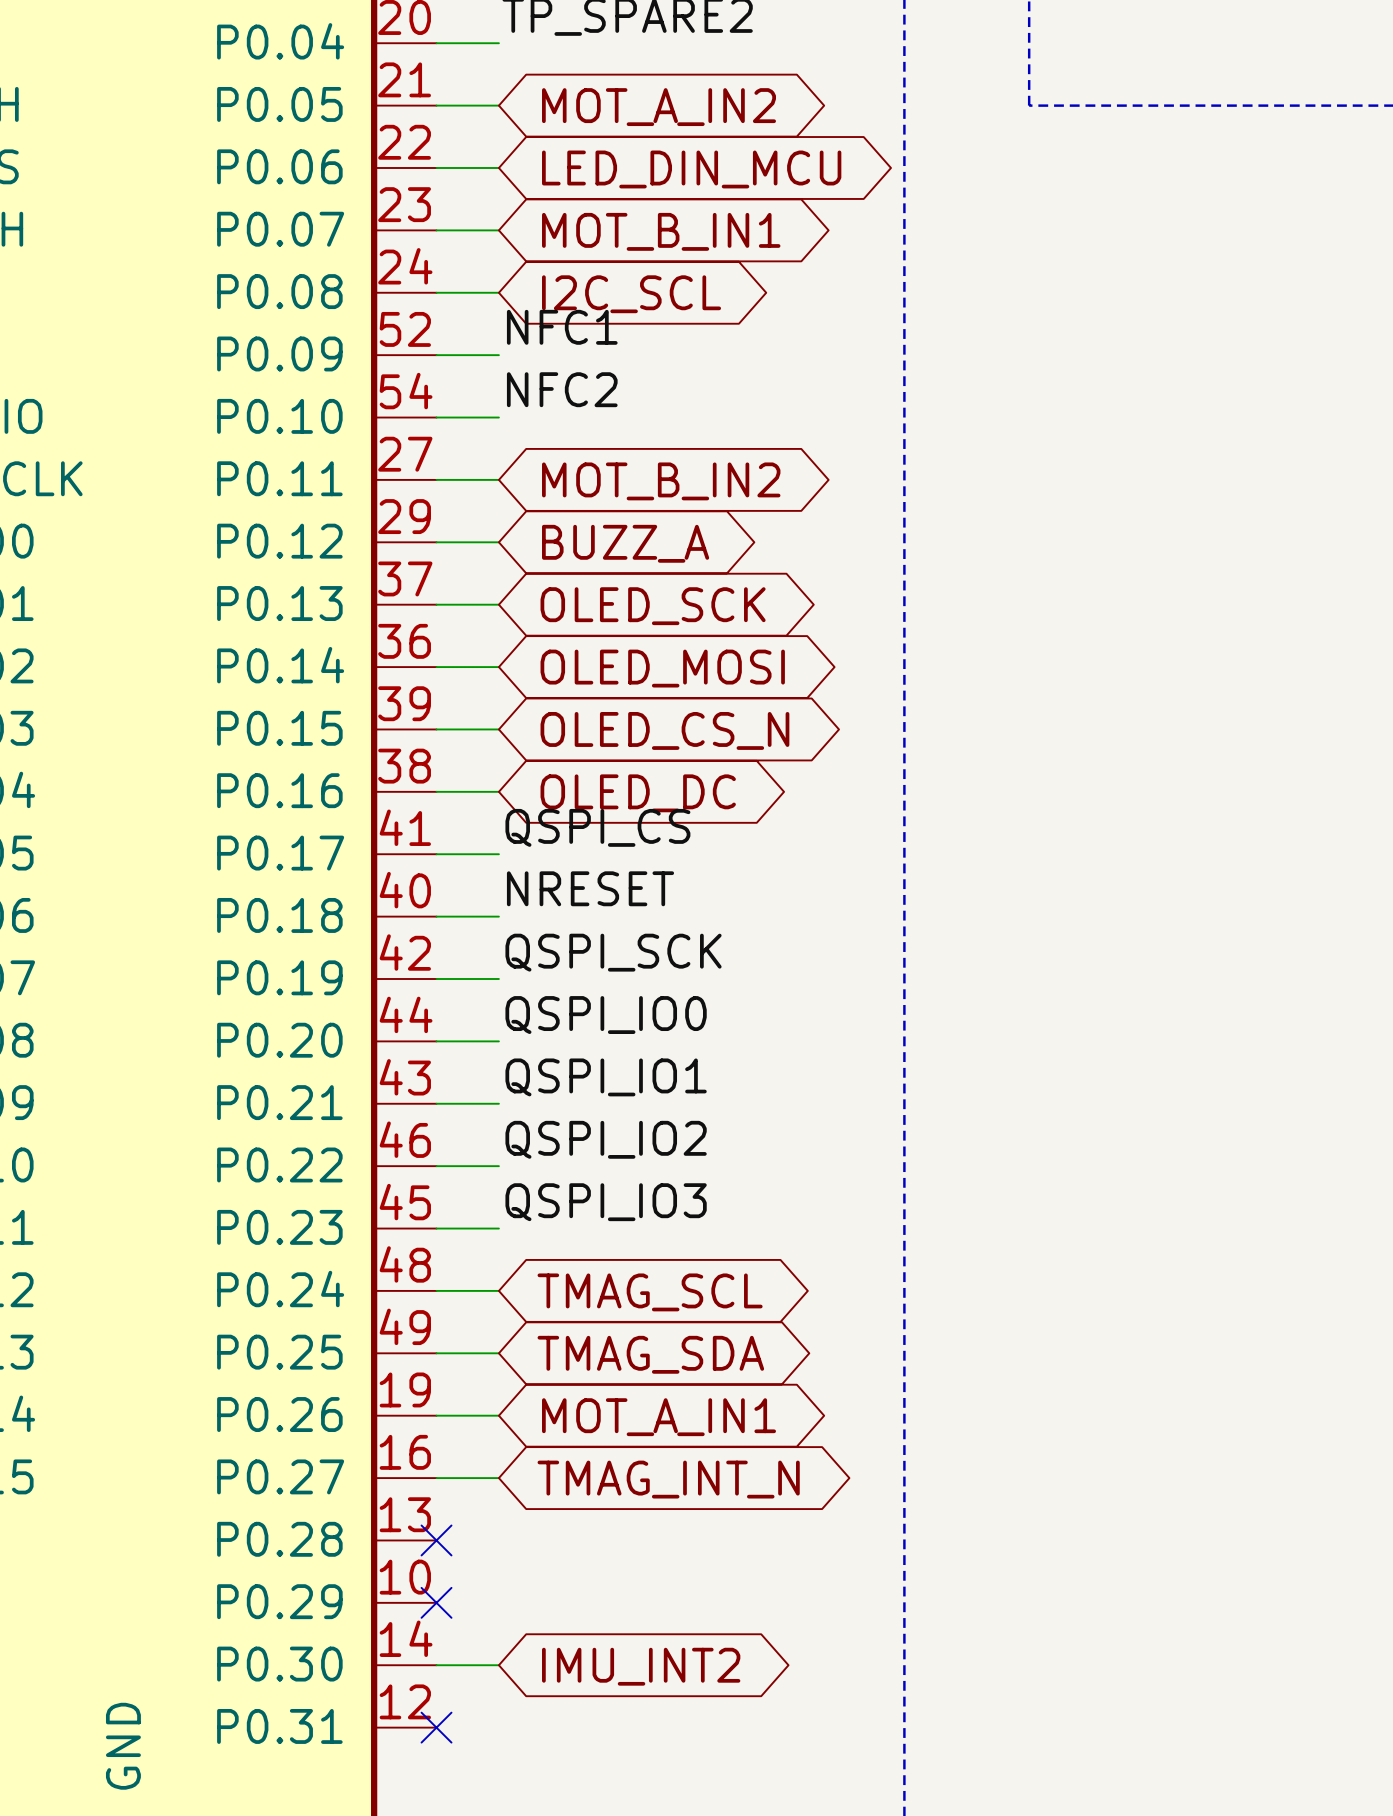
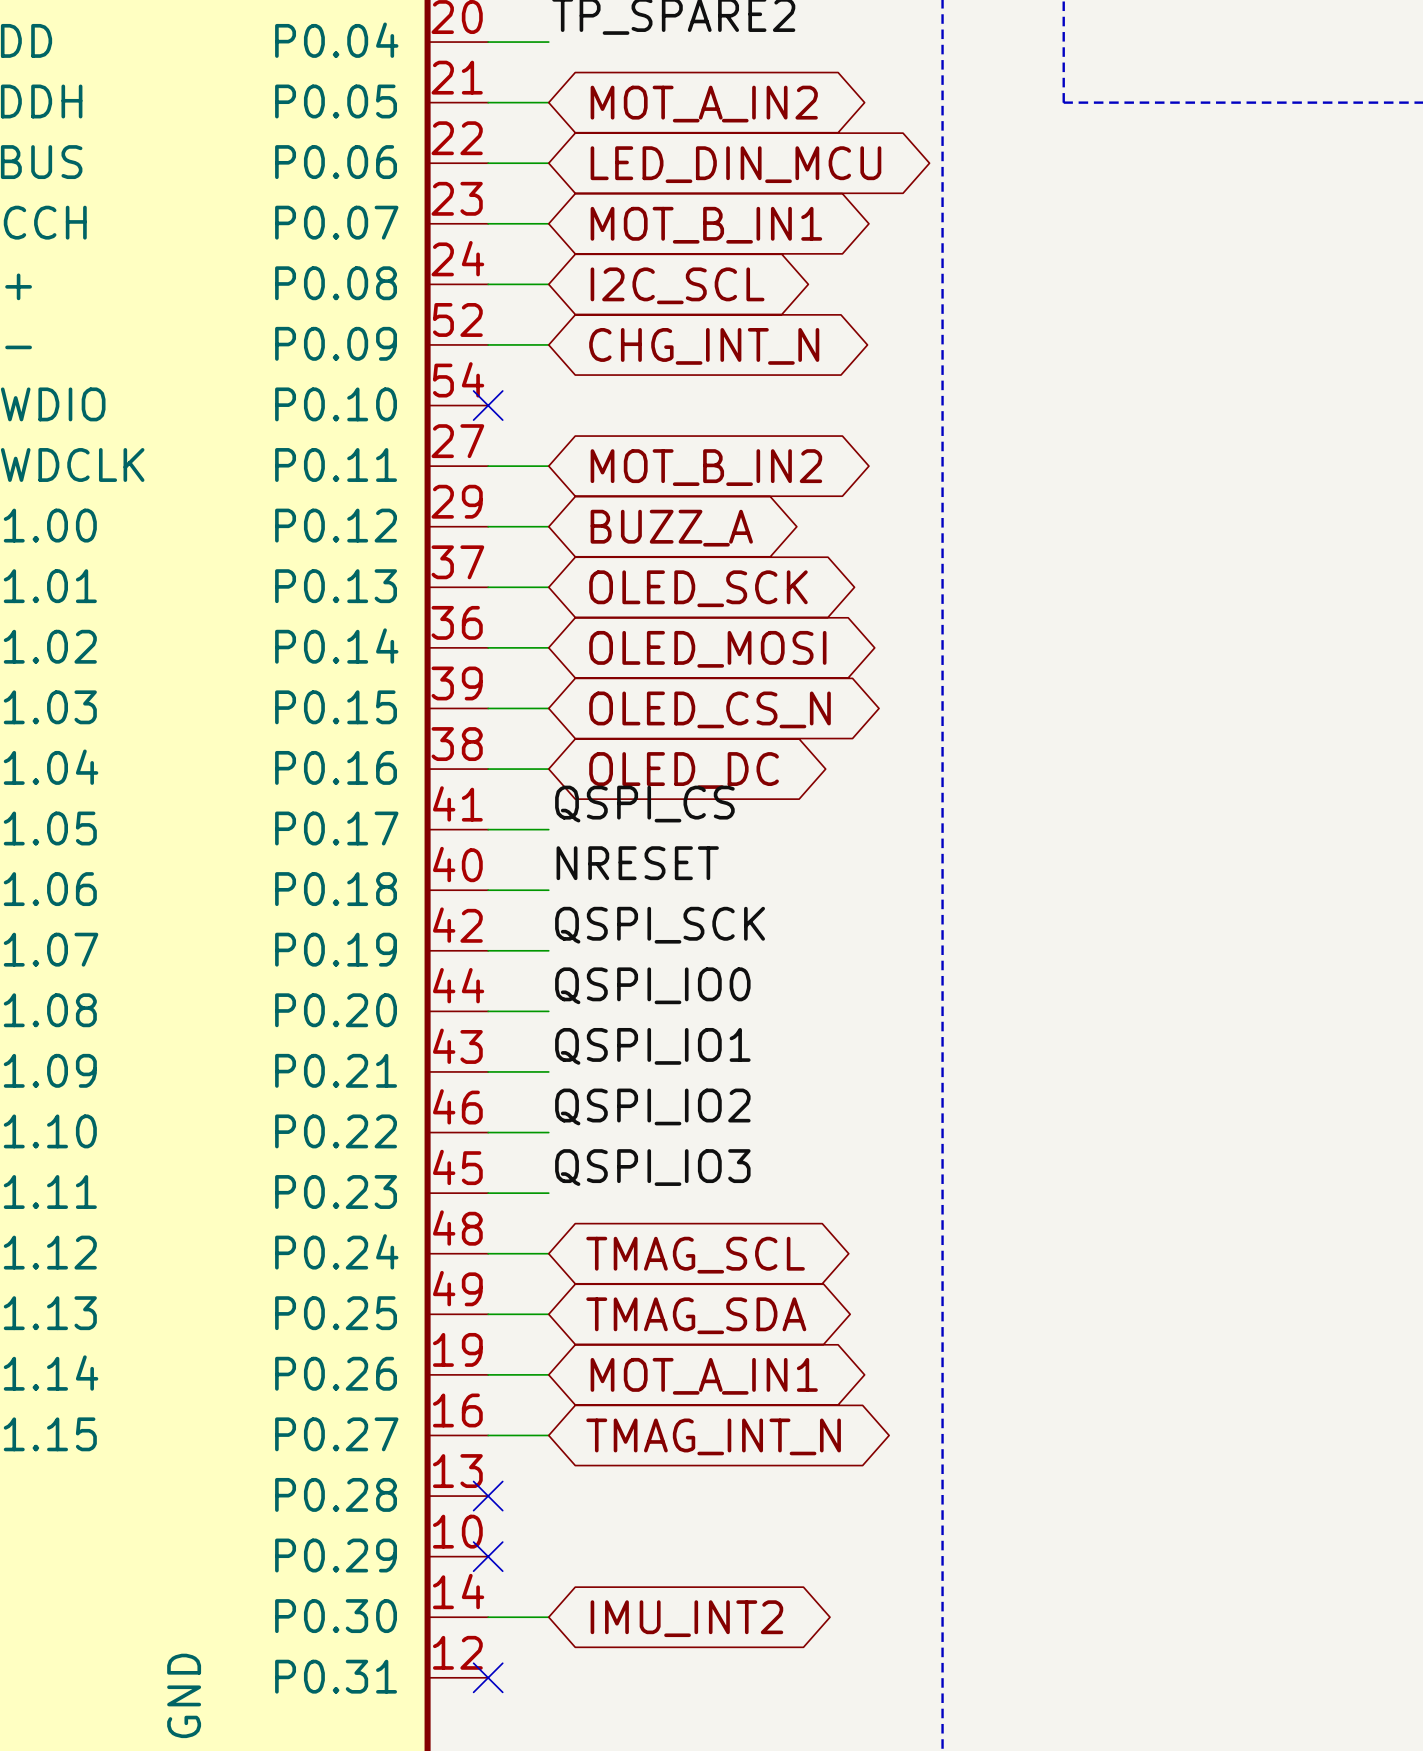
label: NFC1 (562, 327) -> none
global label: none -> CHG_INT_N (704, 346)
label: NFC2 (562, 389) -> none
wire: (436, 417) (498, 417) -> none
no-connect mark: none -> (488, 405)

